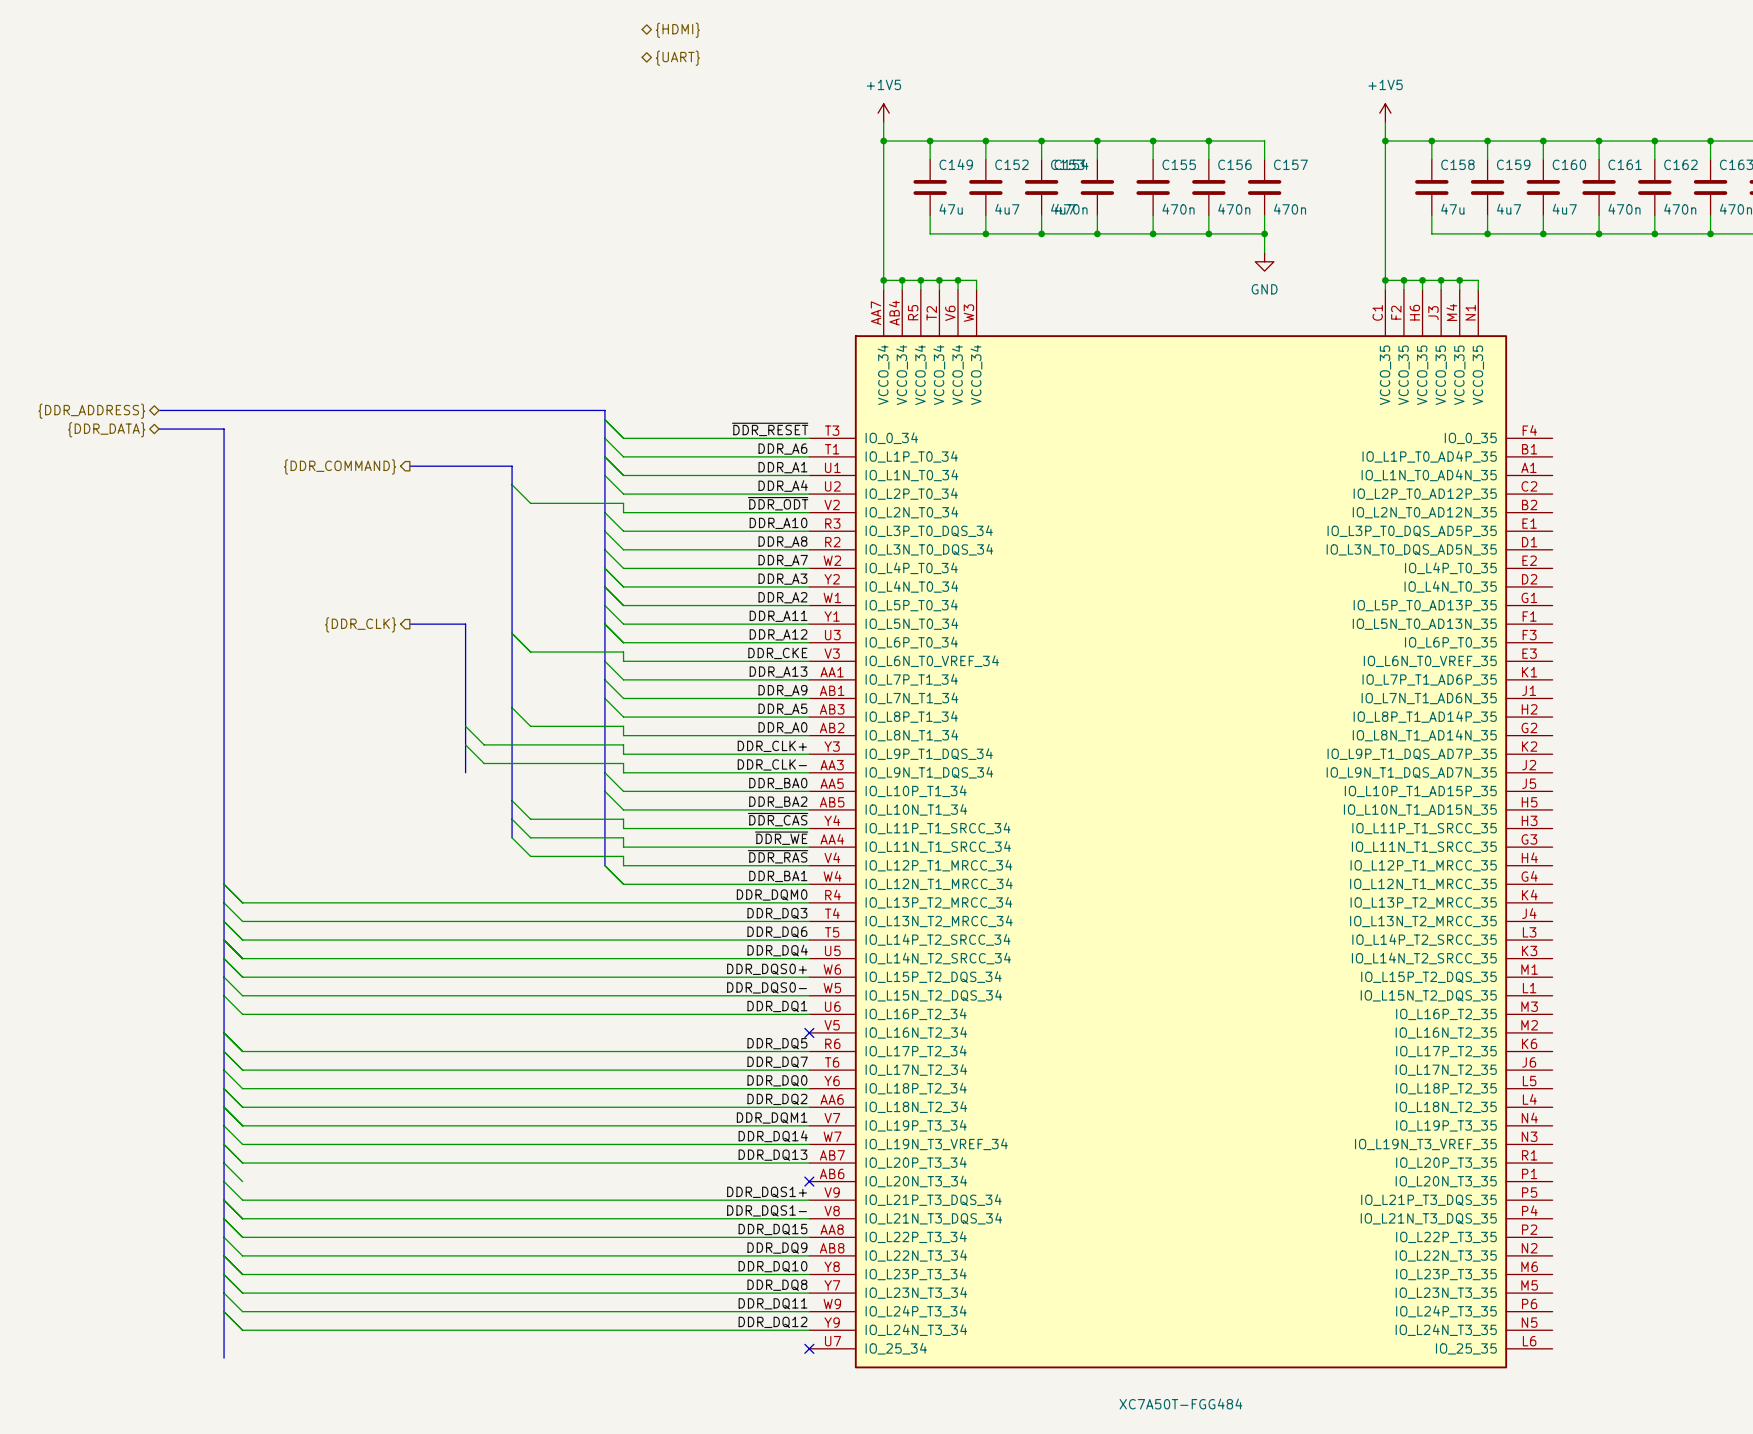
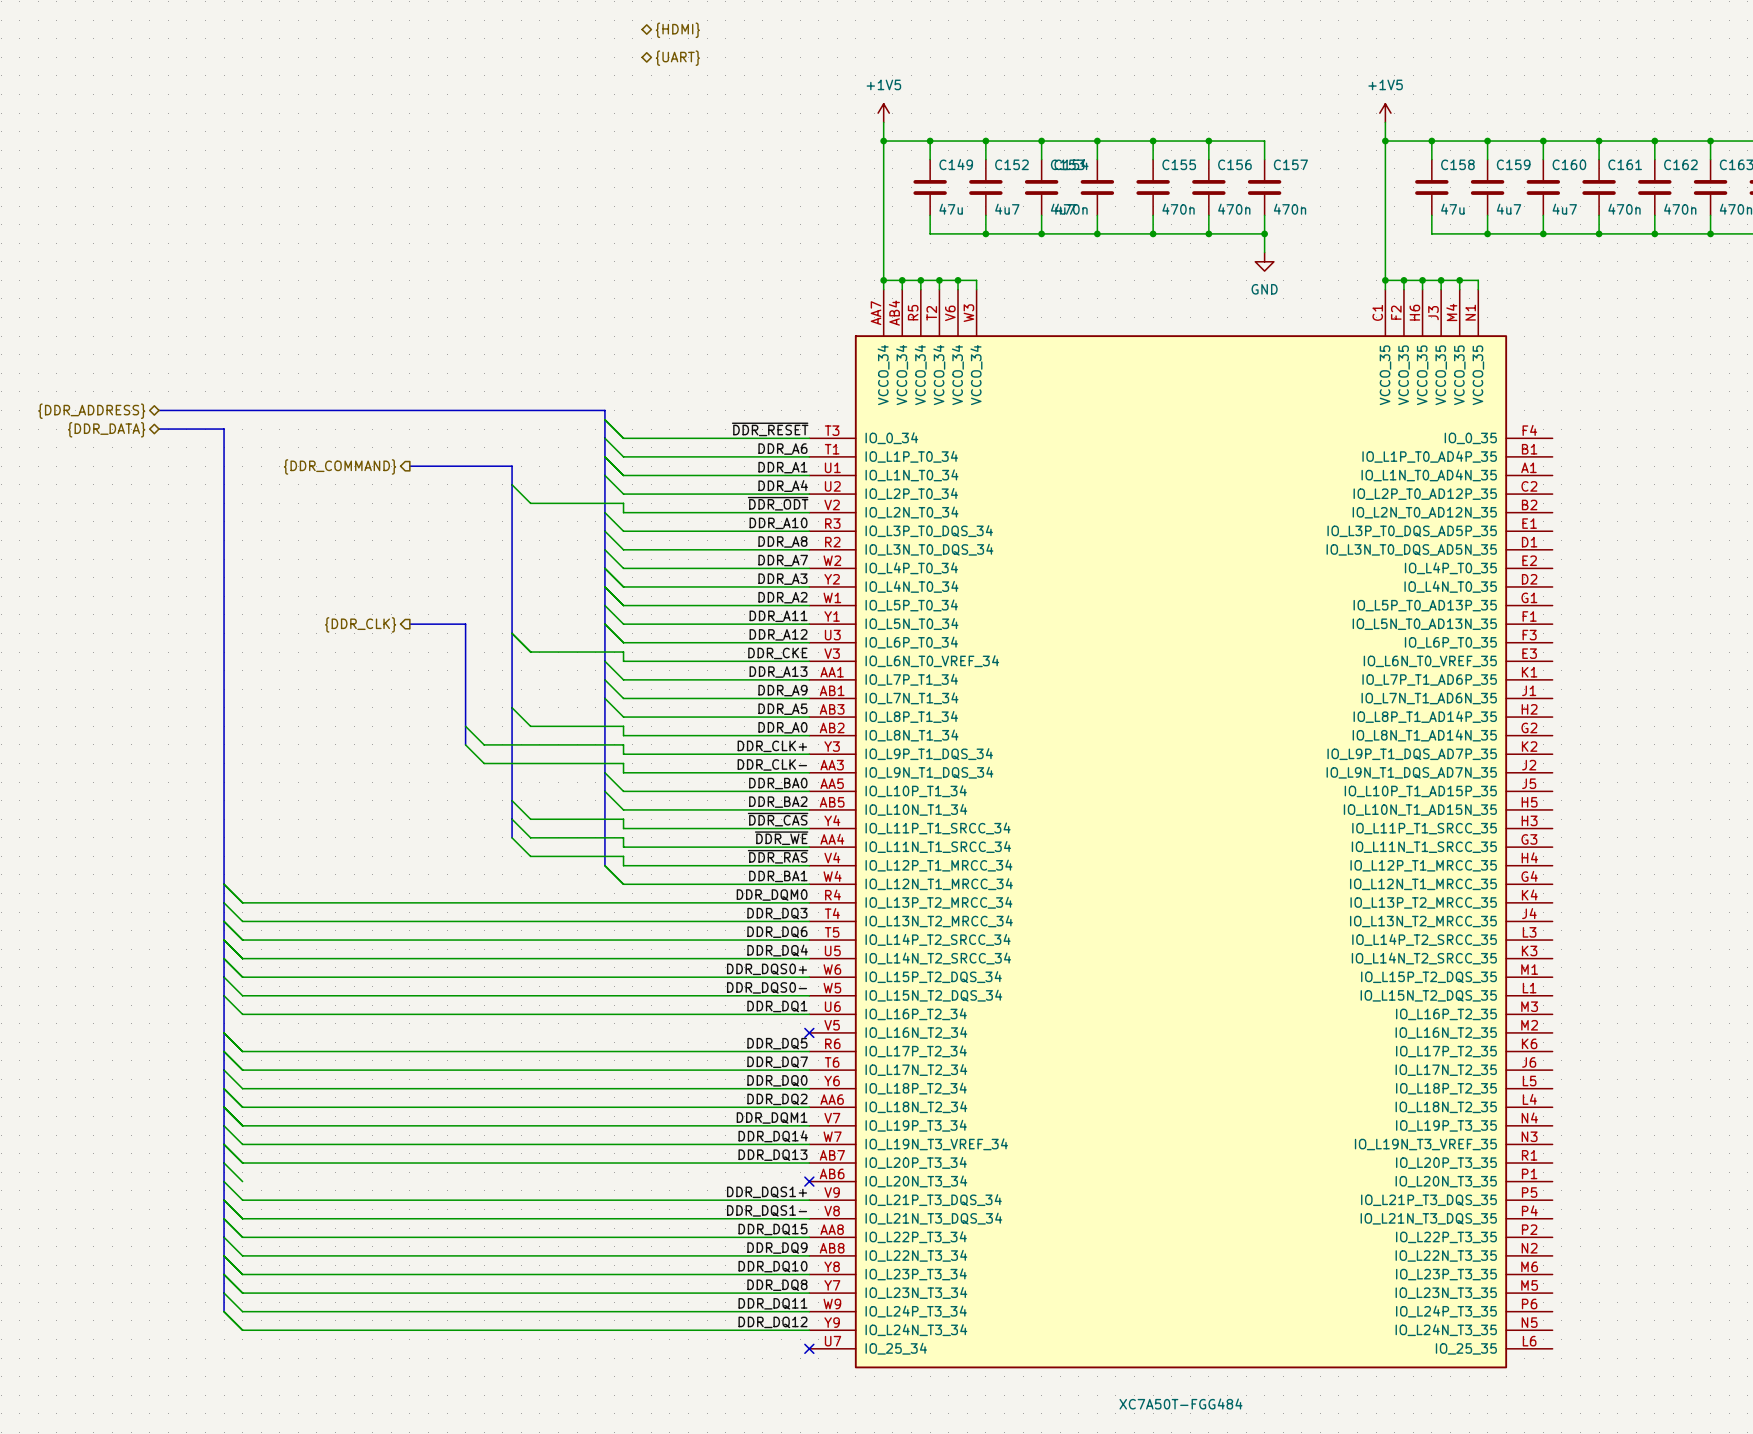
bus: (465, 744) (465, 772) -> none
bus: (224, 1311) (224, 1358) -> none

